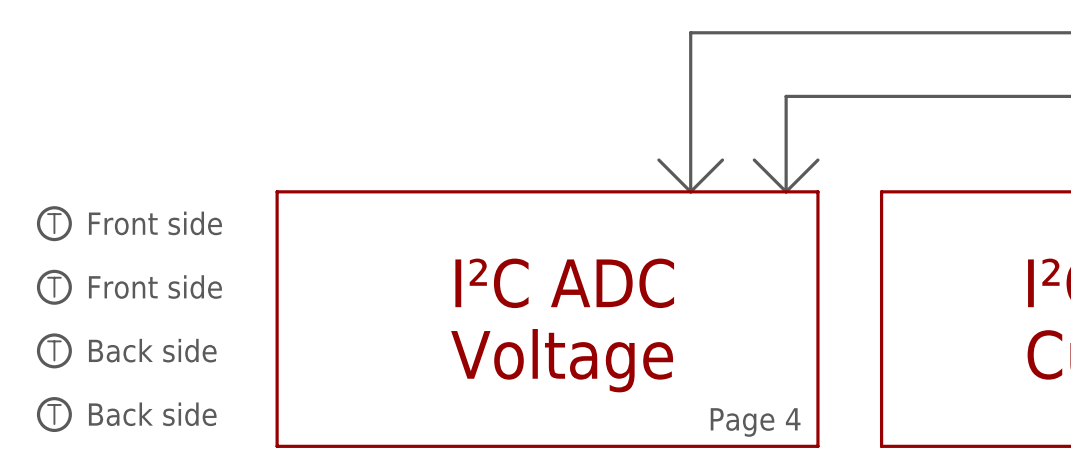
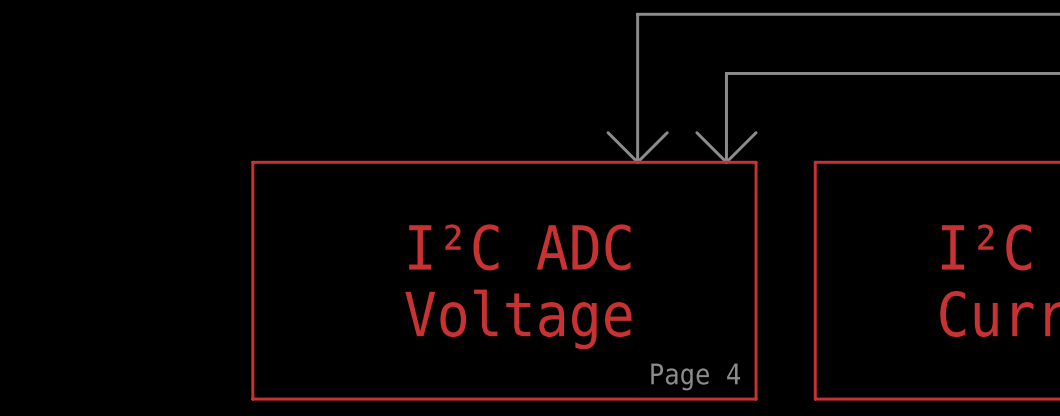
part: (54, 223) -> none
text: Front side (155, 223) -> none
part: (54, 287) -> none
text: Front side (155, 287) -> none
part: (54, 350) -> none
text: Back side (152, 350) -> none
part: (54, 414) -> none
text: Back side (152, 414) -> none

